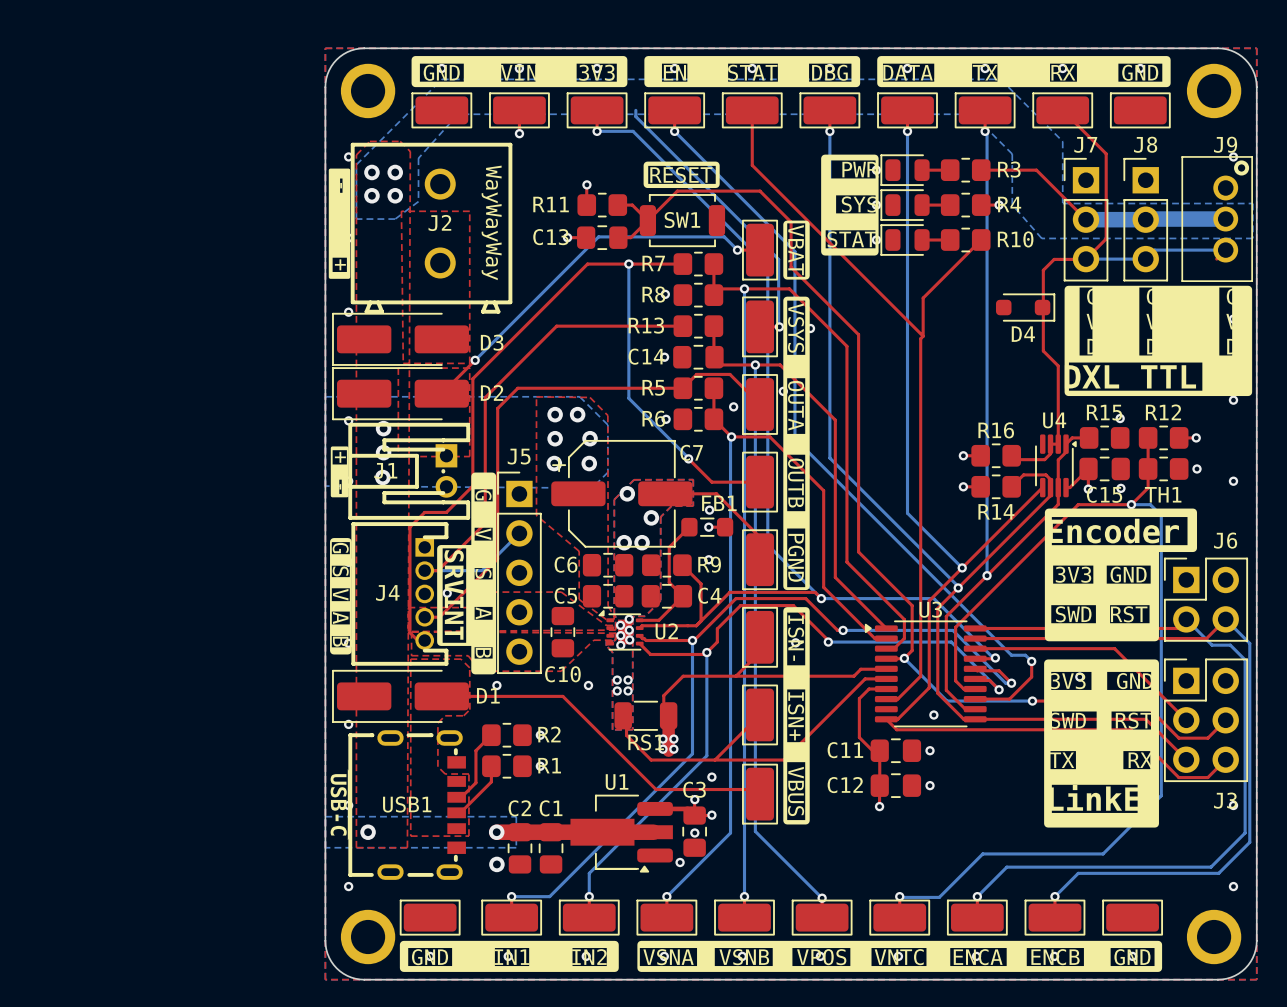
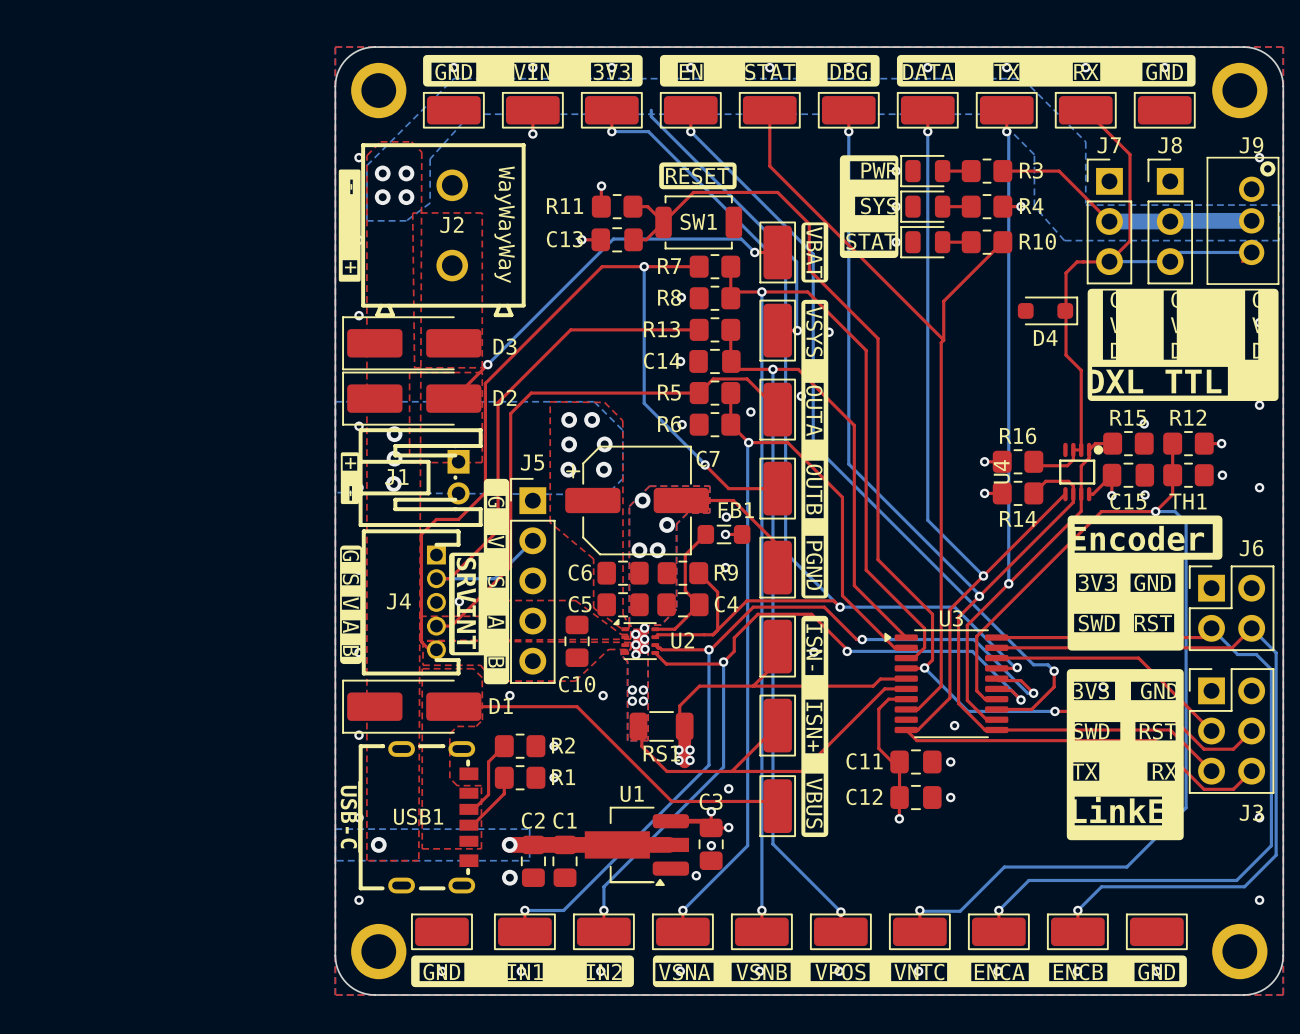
U4 name position: U4 (1054, 420) -> U4 (1001, 471)
U4 footprint: [1035, 434, 1077, 498] -> [1059, 442, 1104, 502]

